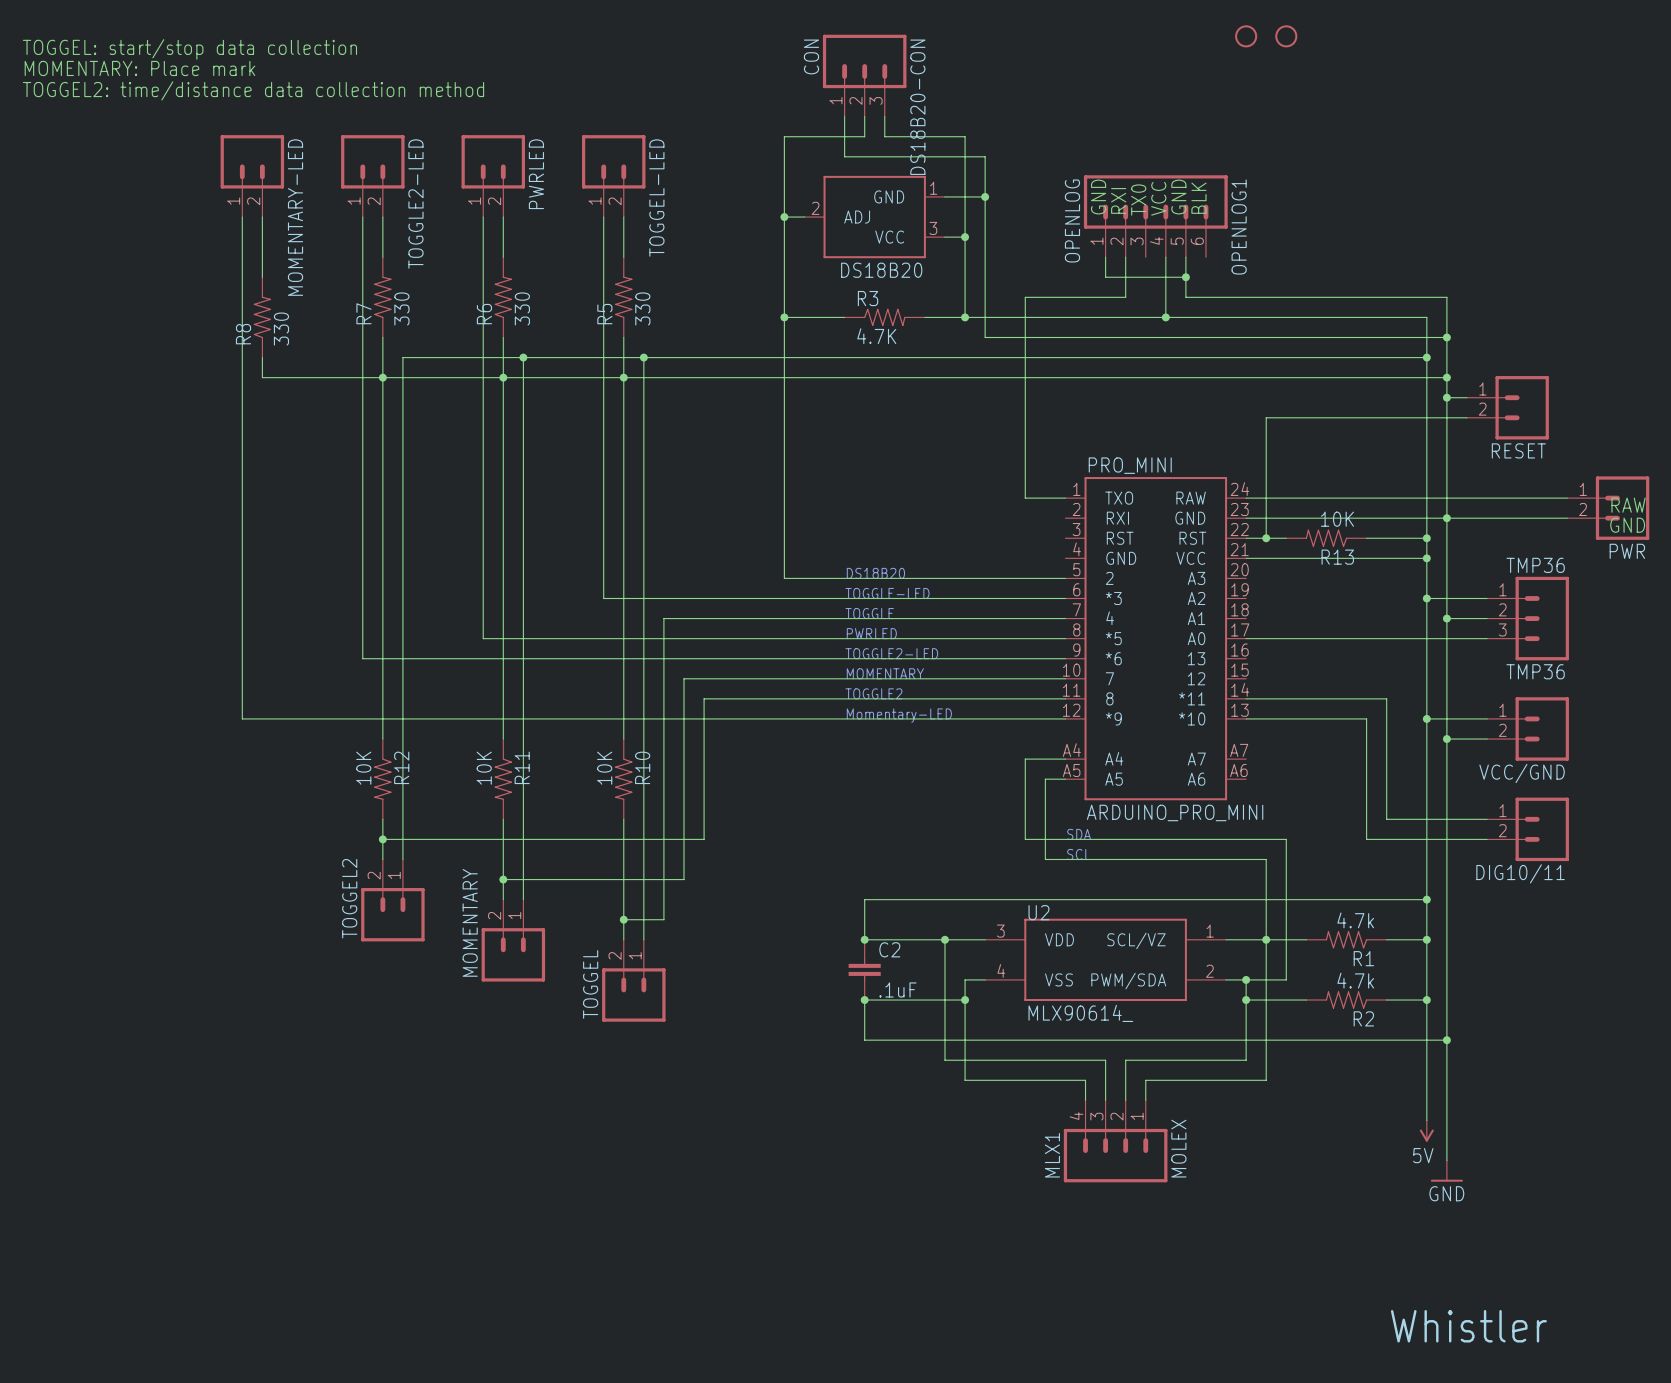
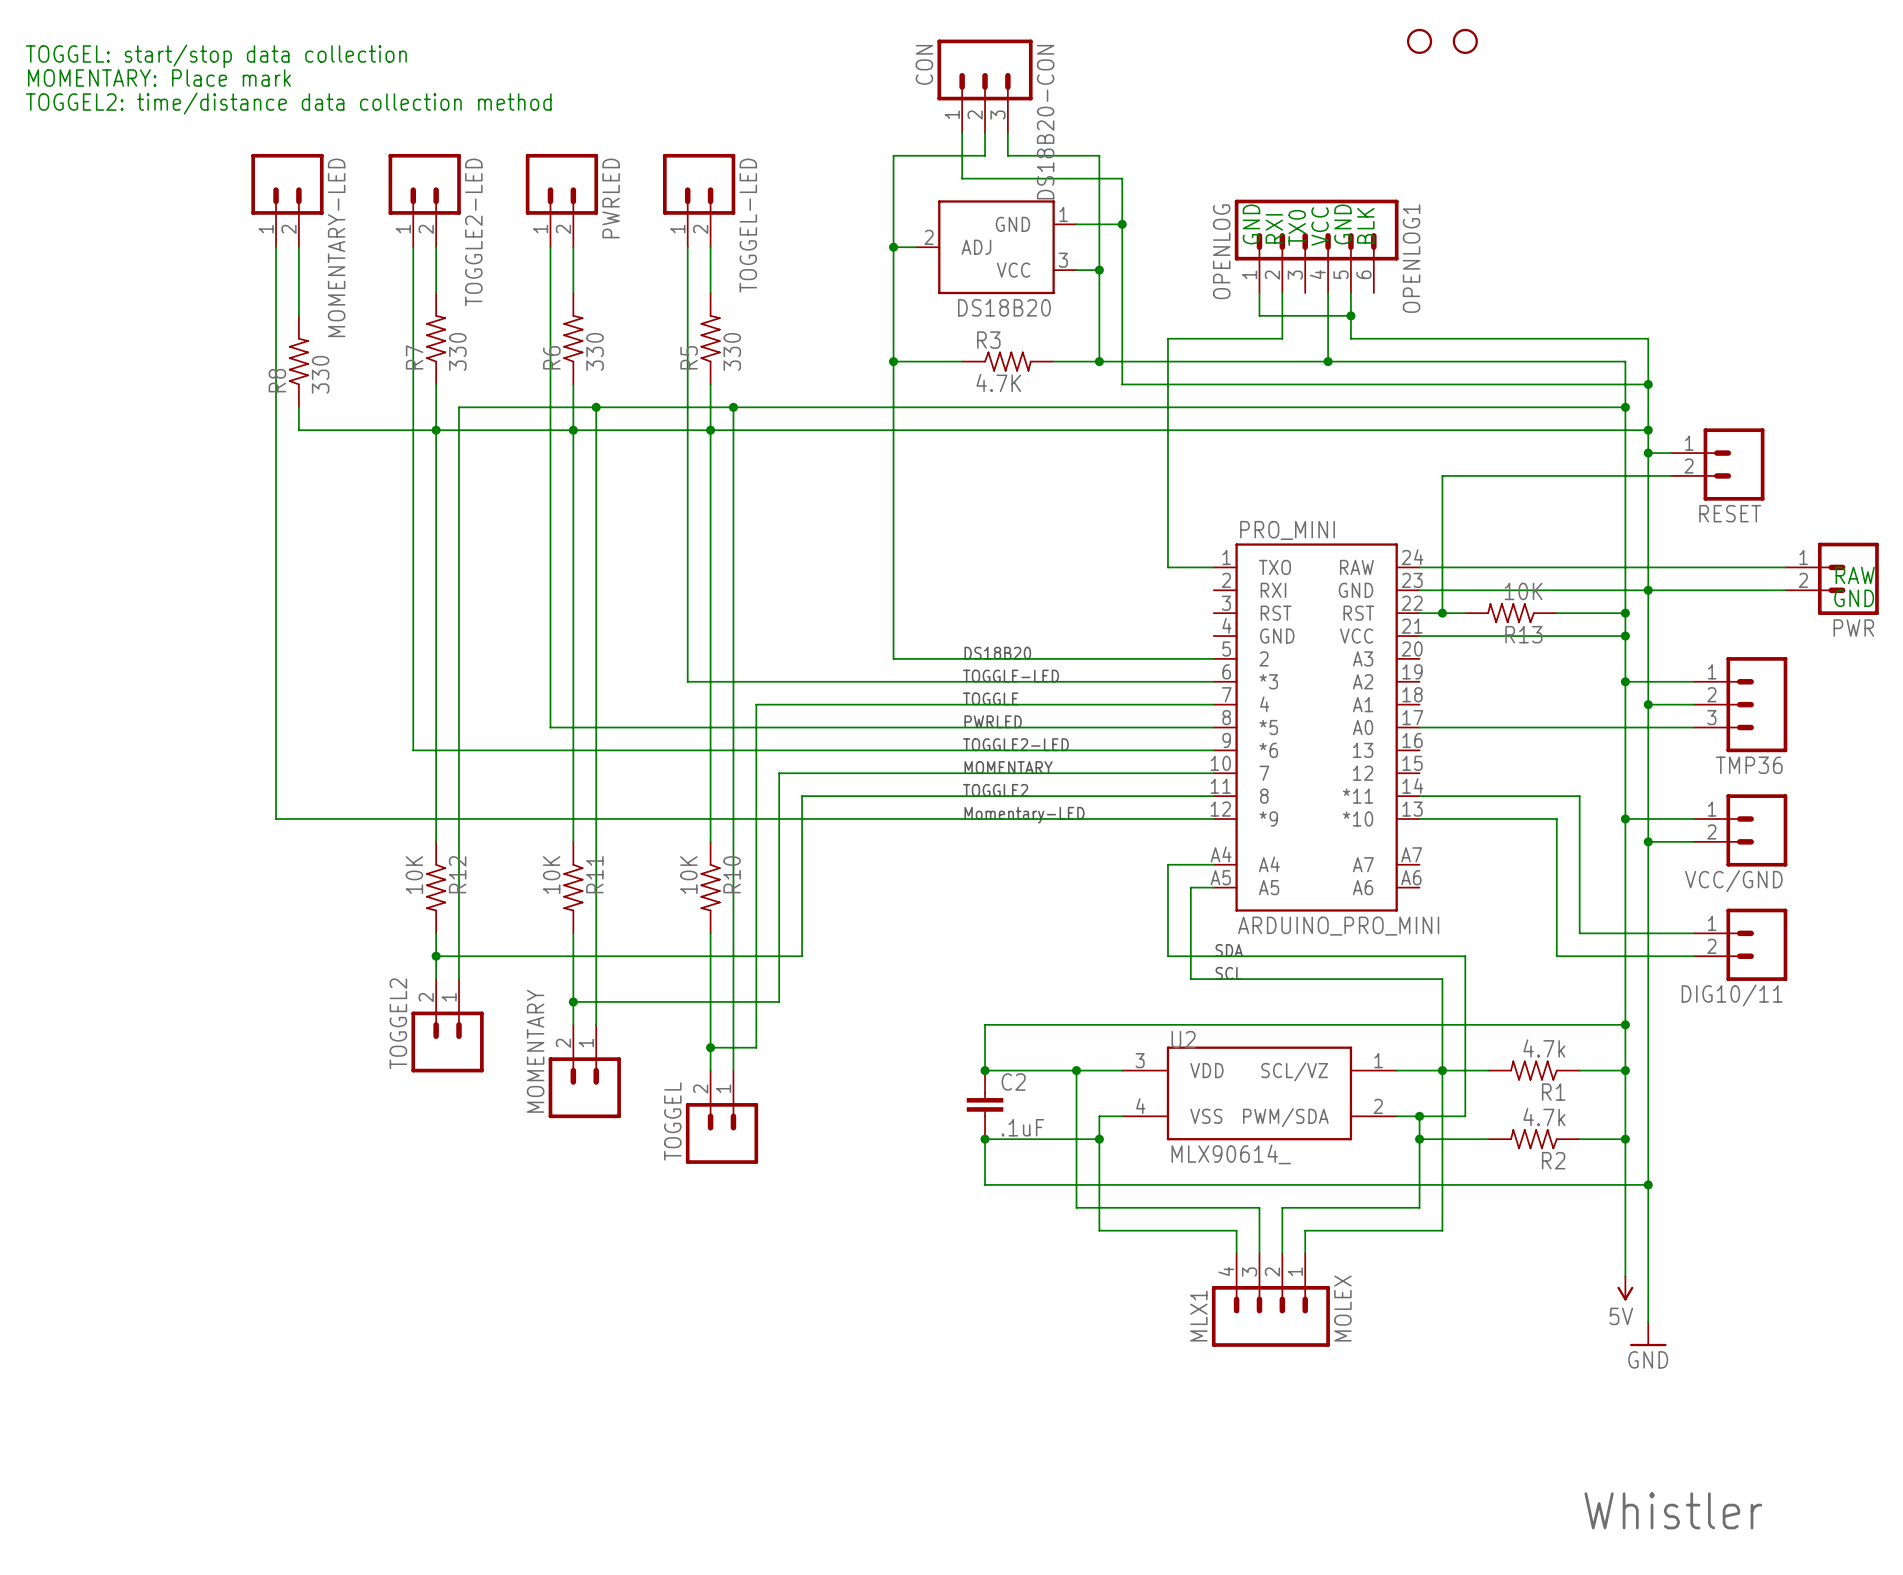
TMP36 value: TMP36 (1535, 565) -> none

